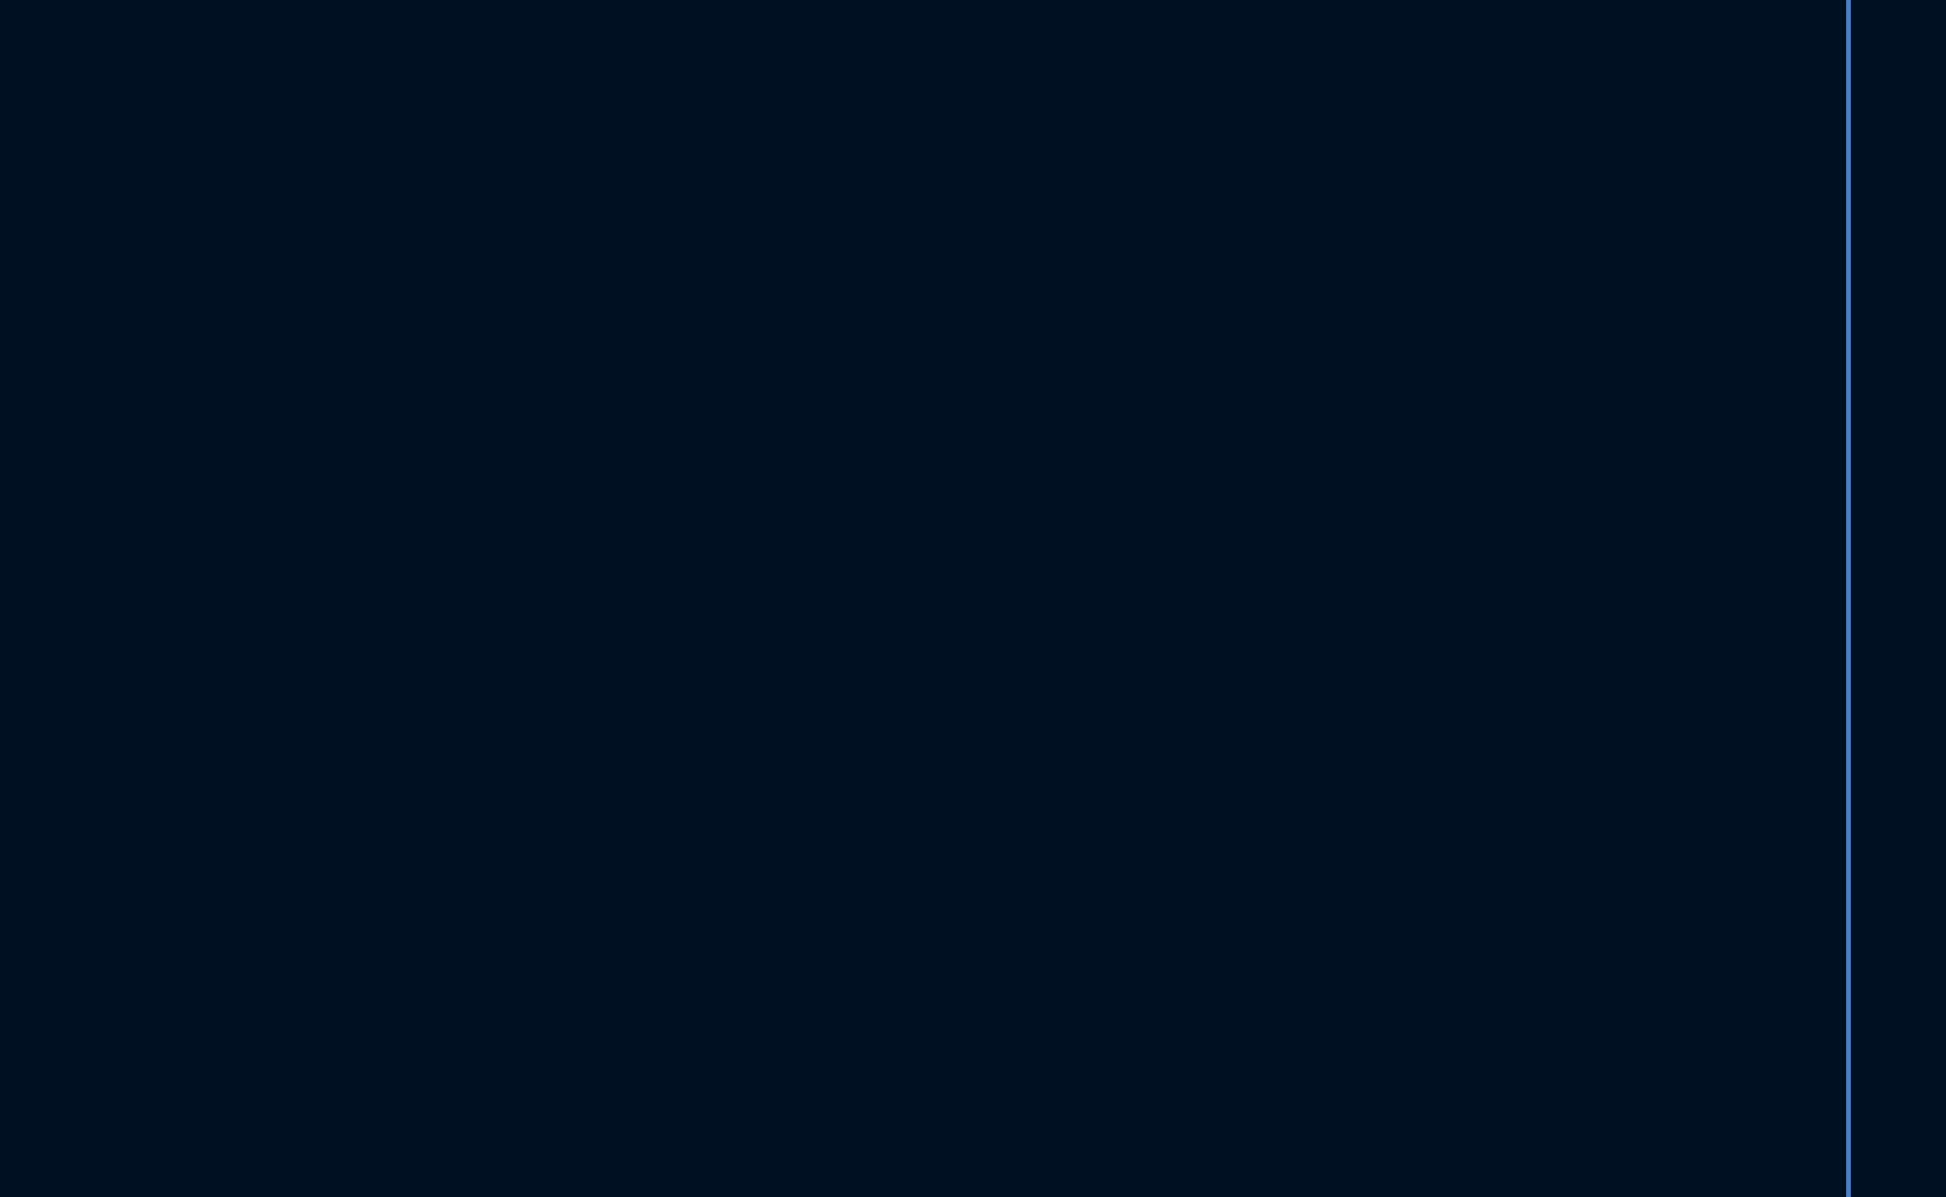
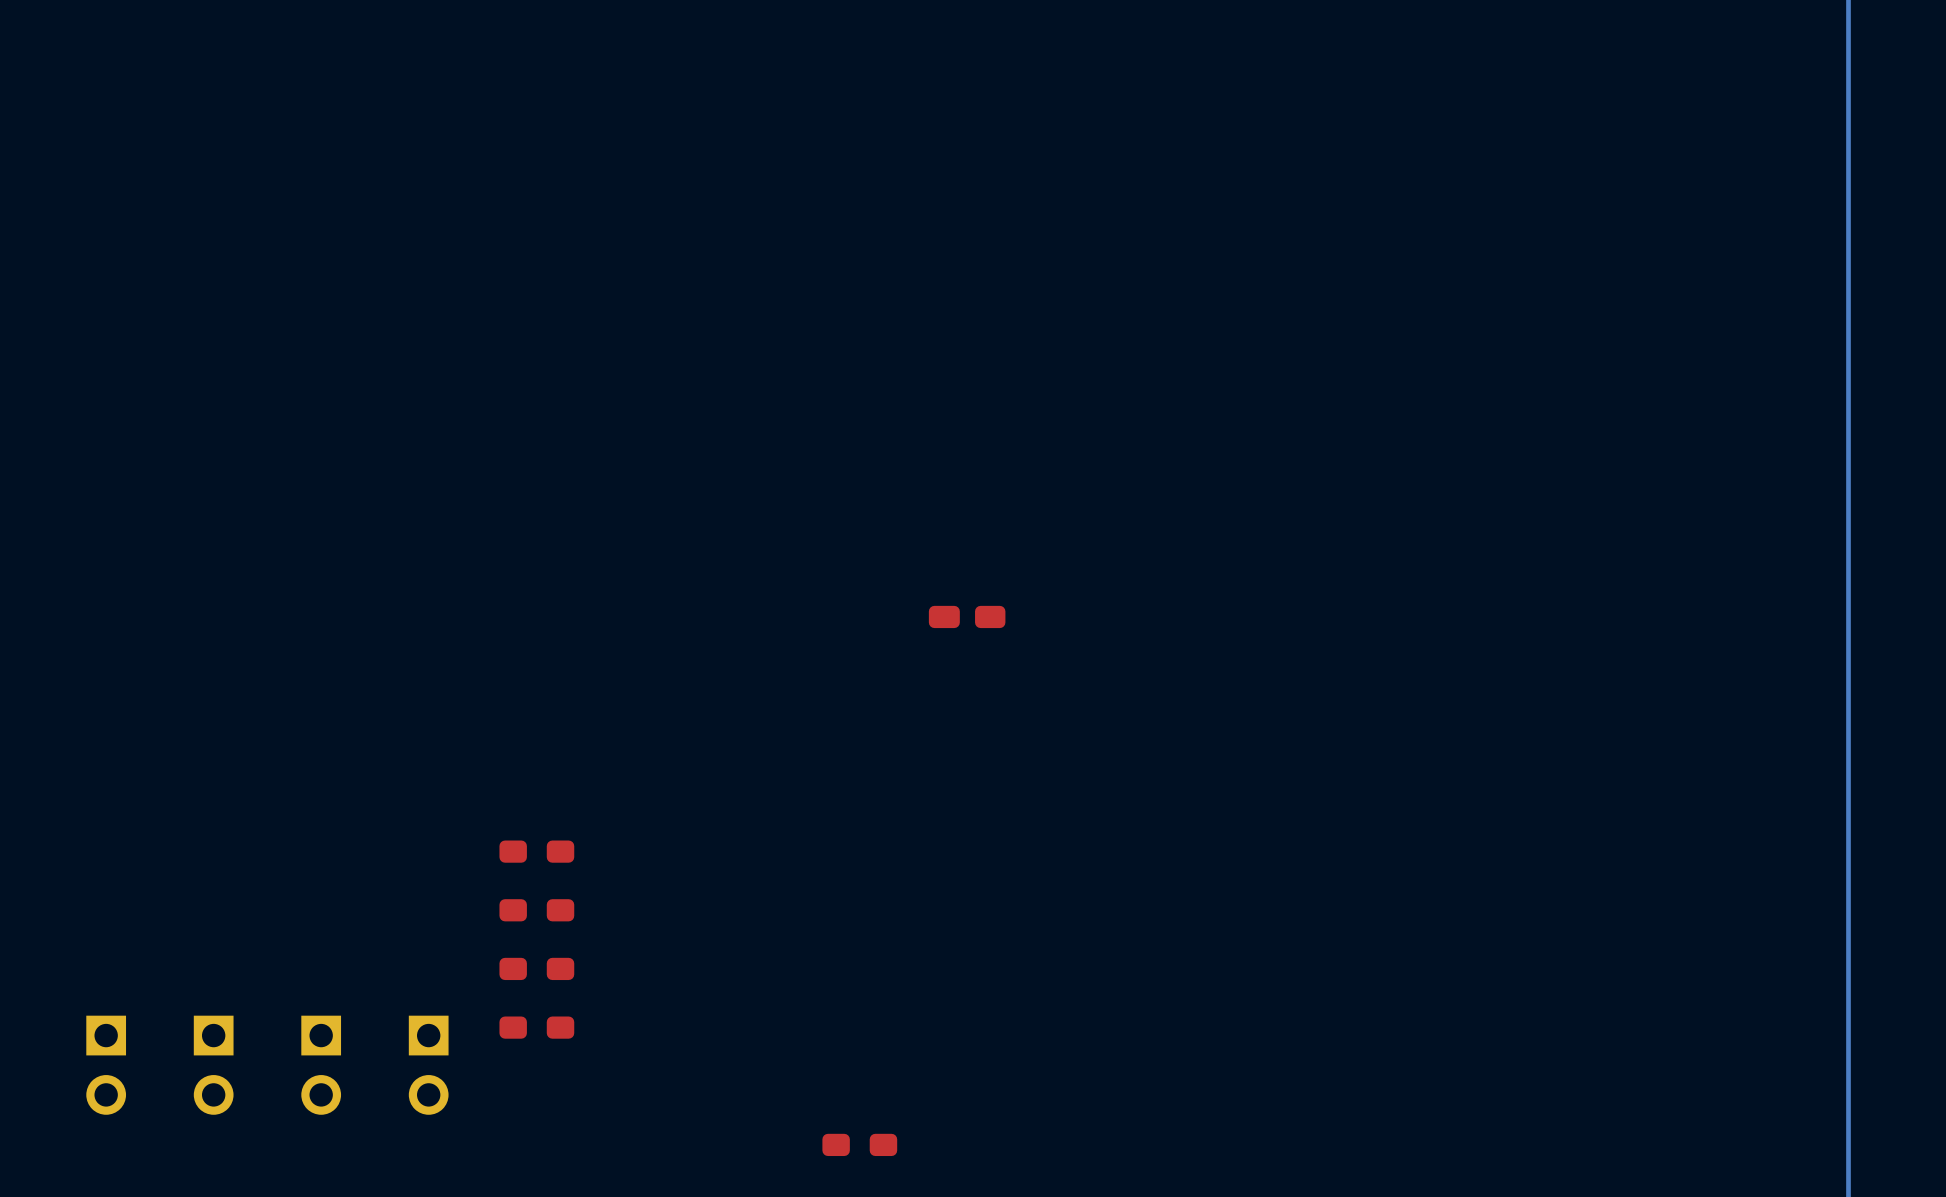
part: none -> (967, 616)
part: none -> (536, 851)
part: none -> (536, 910)
part: none -> (536, 968)
part: none -> (536, 1027)
part: none -> (106, 1065)
part: none -> (213, 1065)
part: none -> (321, 1065)
part: none -> (428, 1065)
part: none -> (859, 1144)

